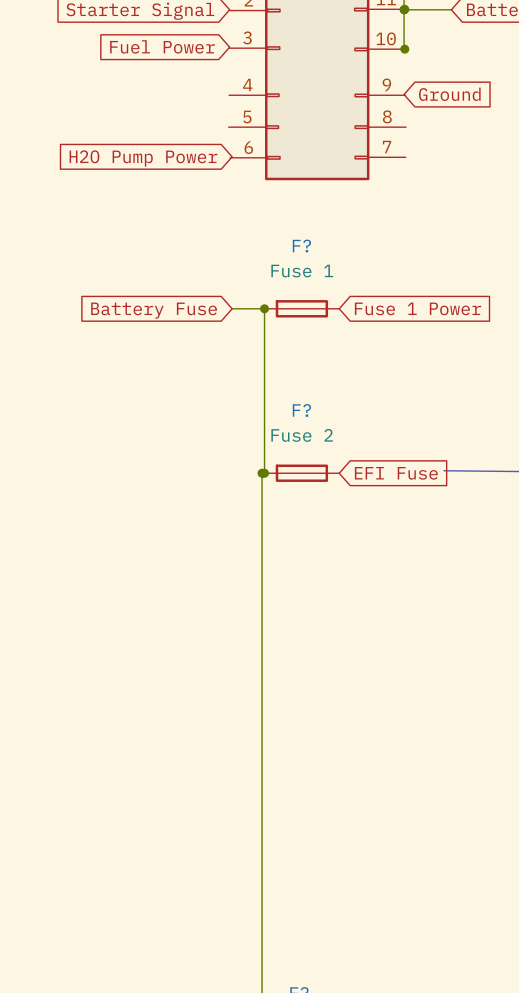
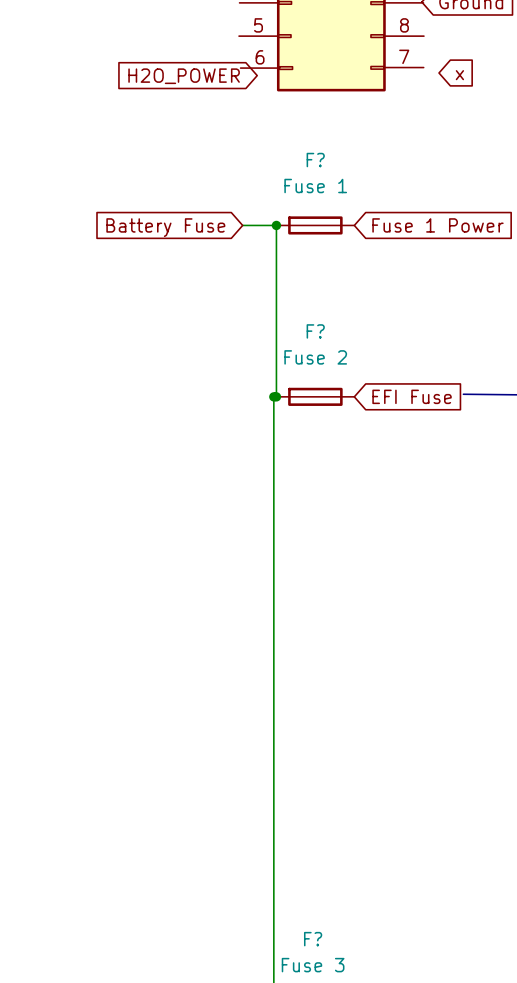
global label: H2O Pump Power (143, 158) -> none
global label: none -> x (459, 75)
global label: none -> H2O_POWER (184, 76)

